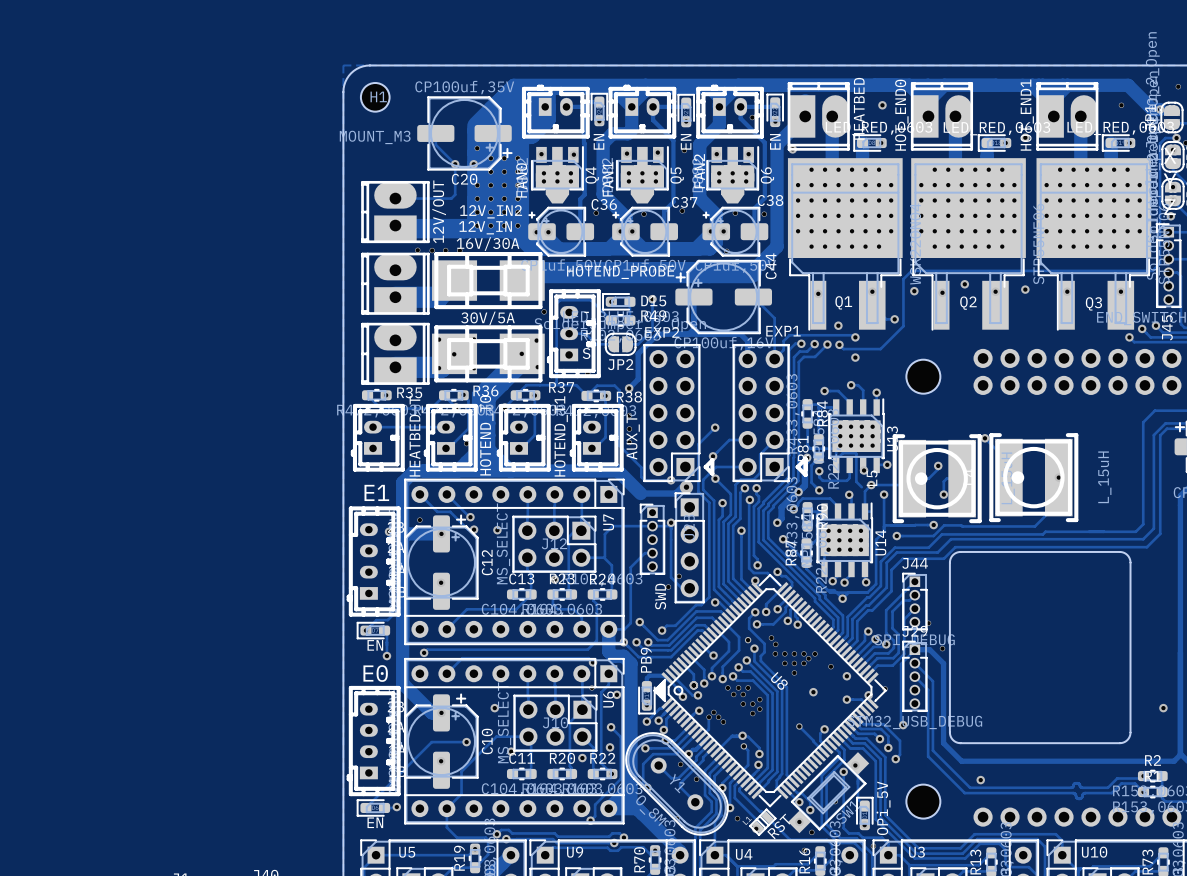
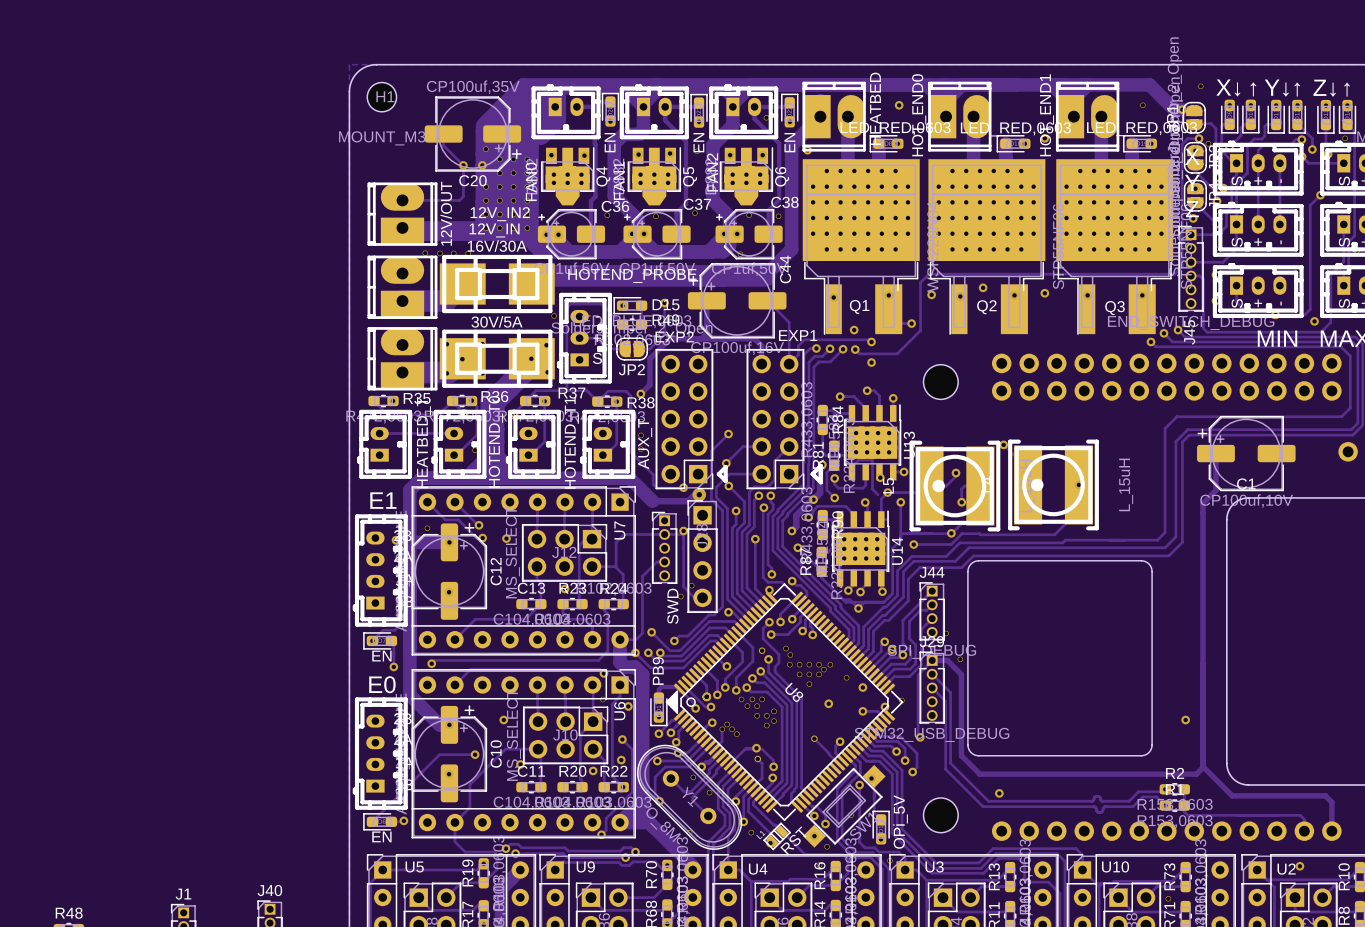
track: (933, 525) (914, 525) -> (961, 523) (951, 533) (932, 533)

